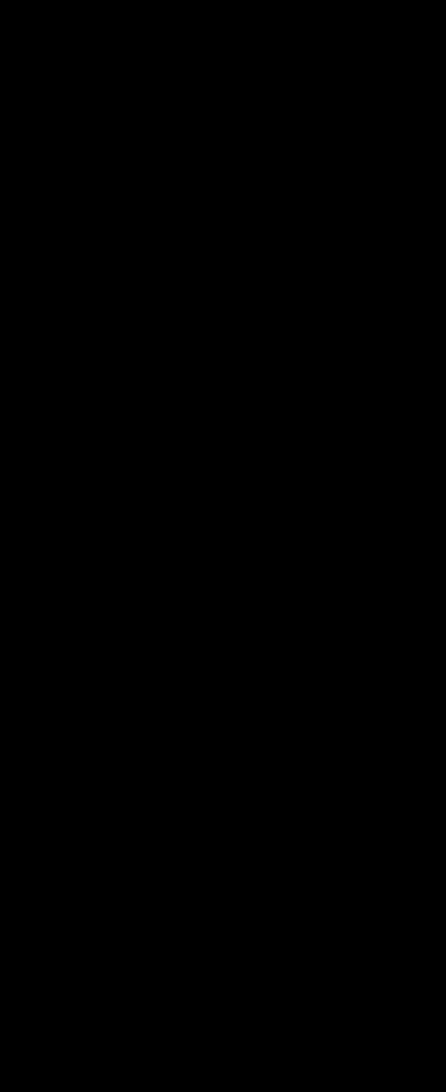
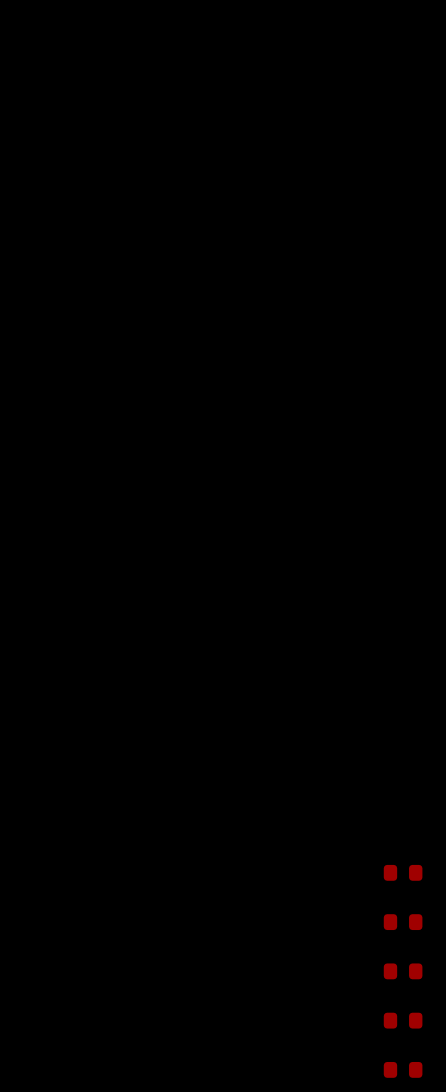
part: none -> (403, 872)
part: none -> (403, 922)
part: none -> (403, 971)
part: none -> (403, 1020)
part: none -> (403, 1069)

